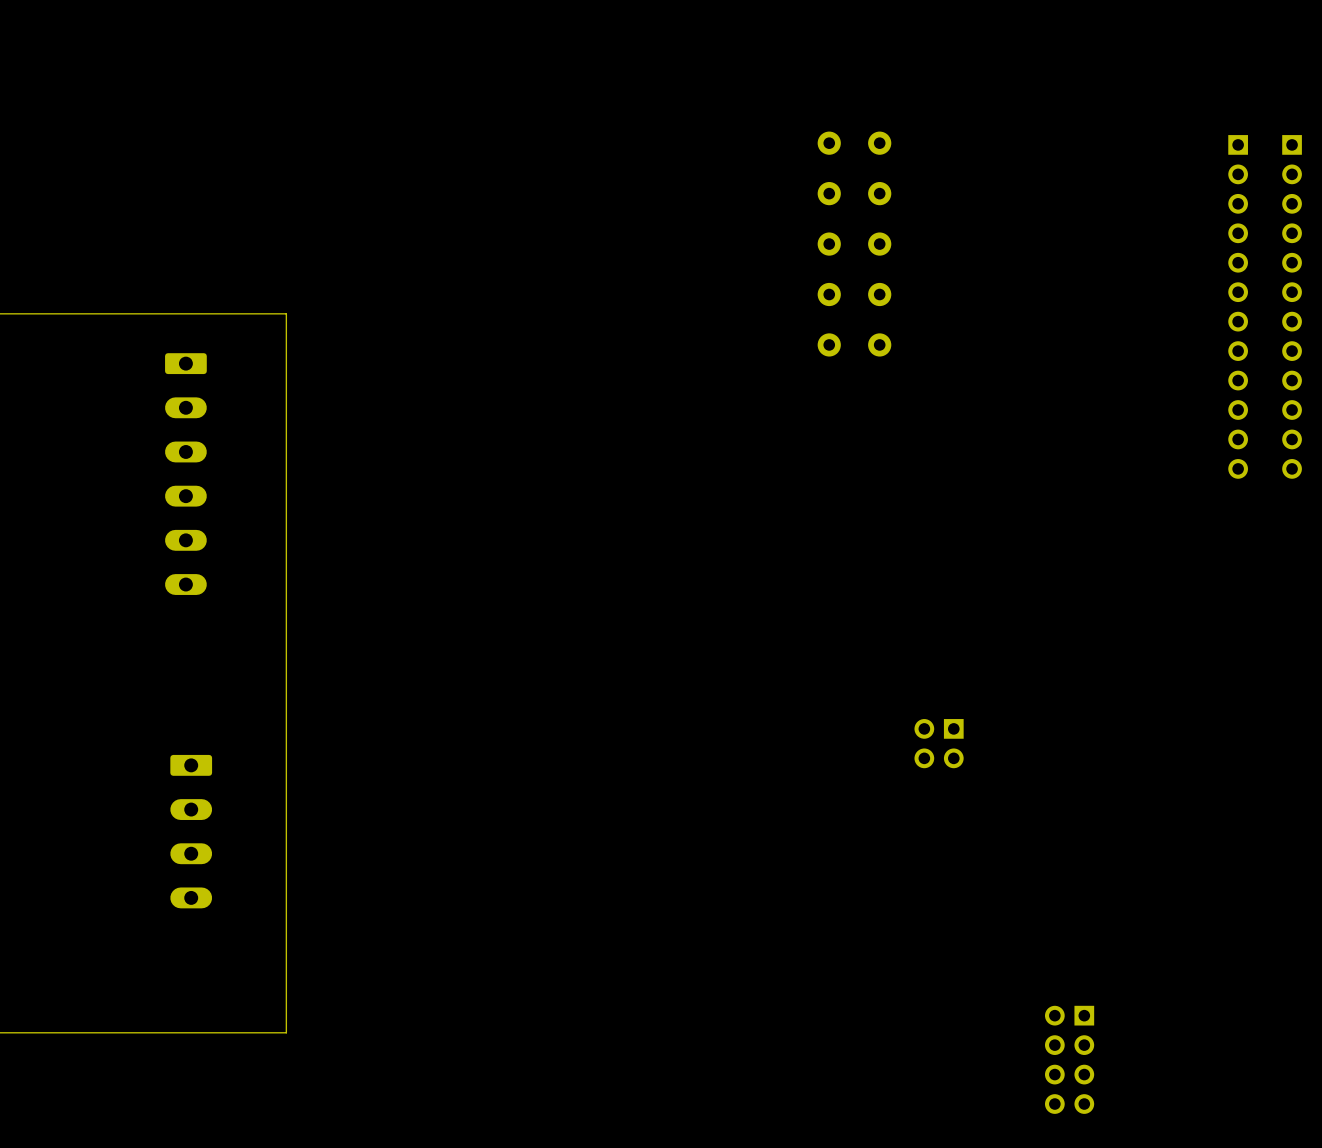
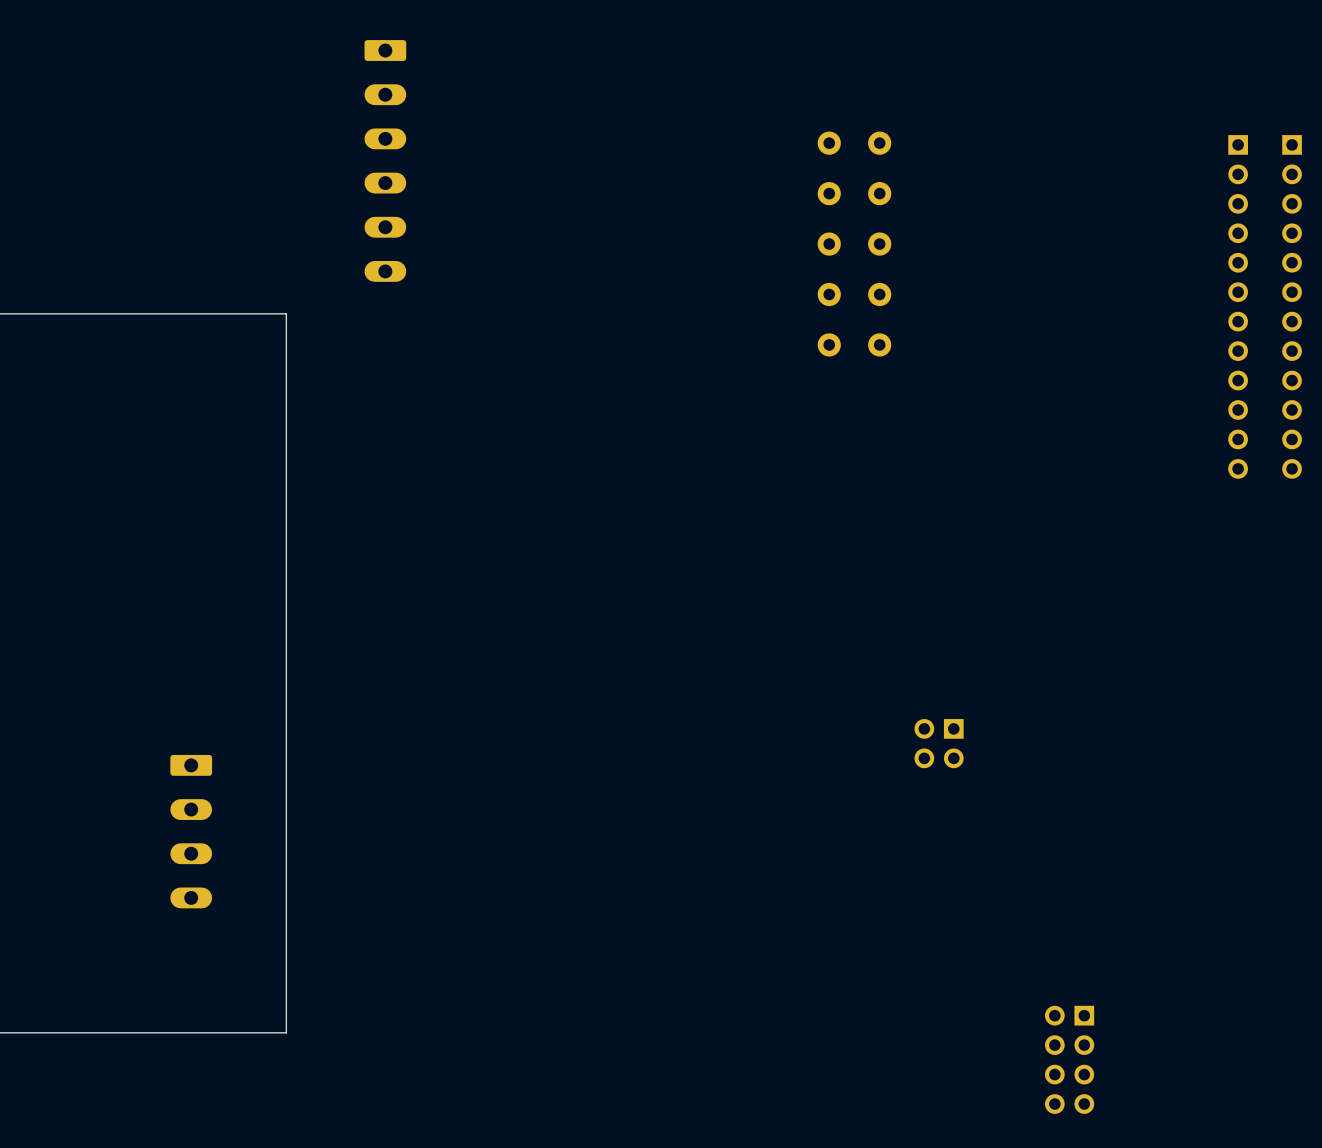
part: none -> (385, 160)
part: (185, 474) -> none

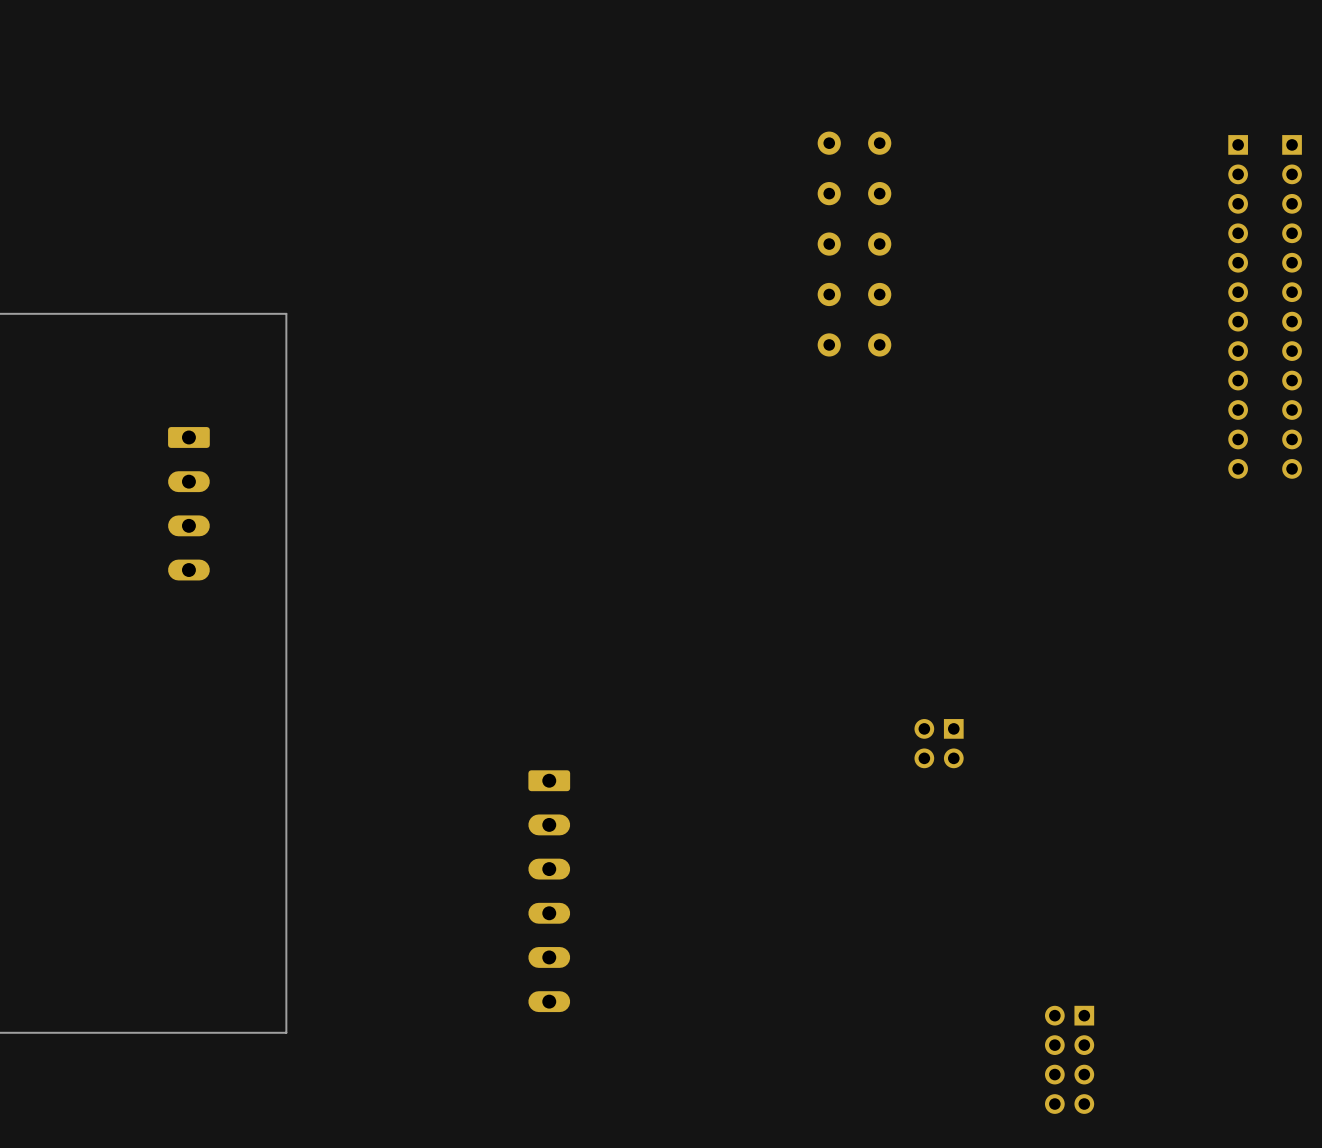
part: (385, 160) -> none
part: none -> (188, 503)
part: (191, 831) -> none
part: none -> (549, 891)

